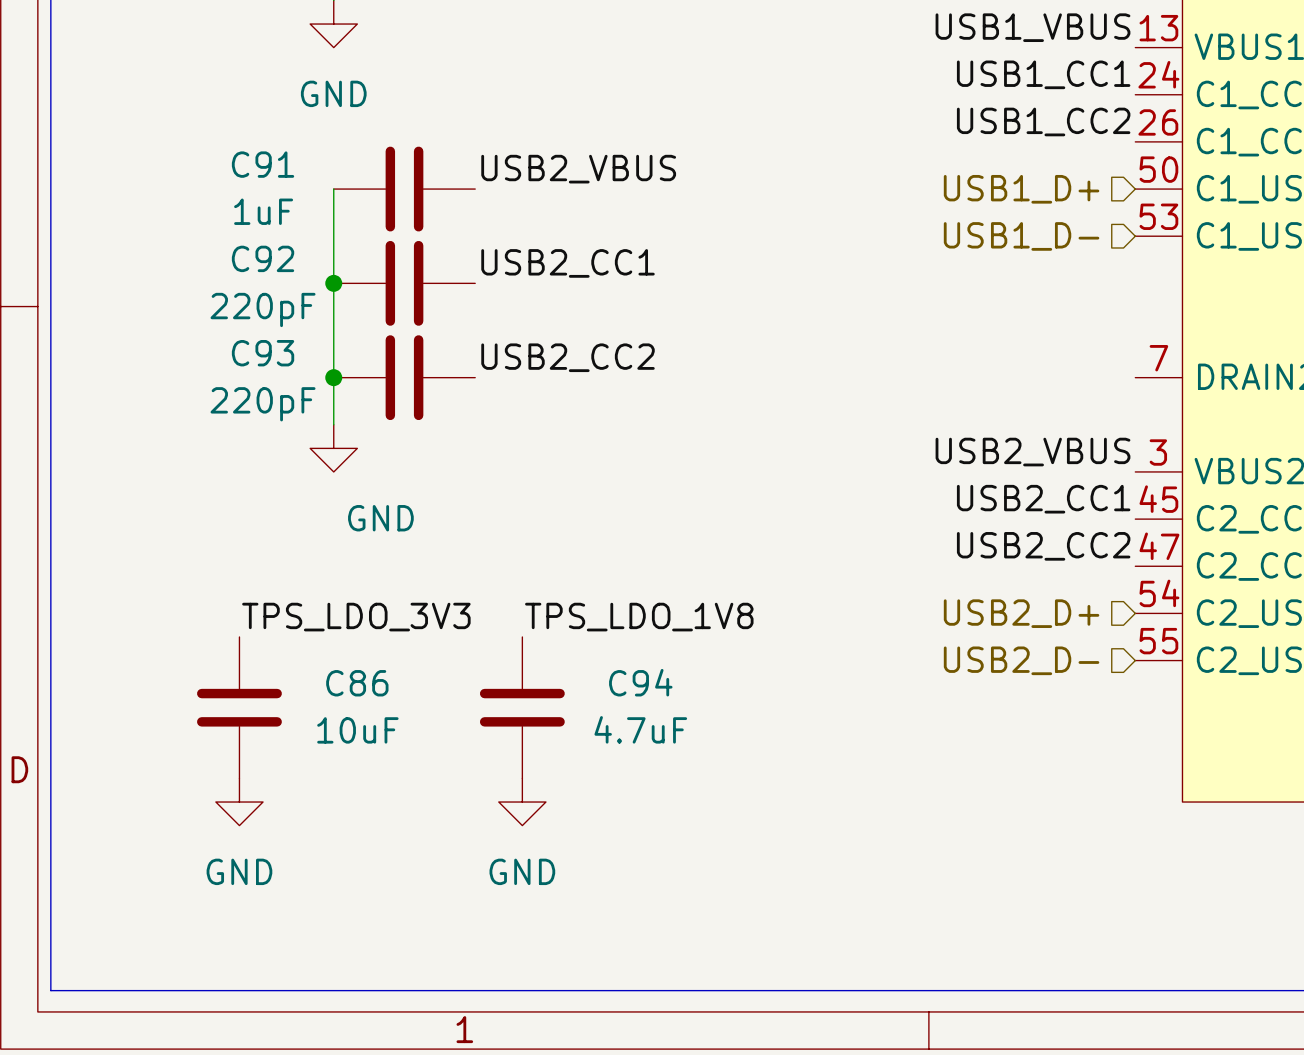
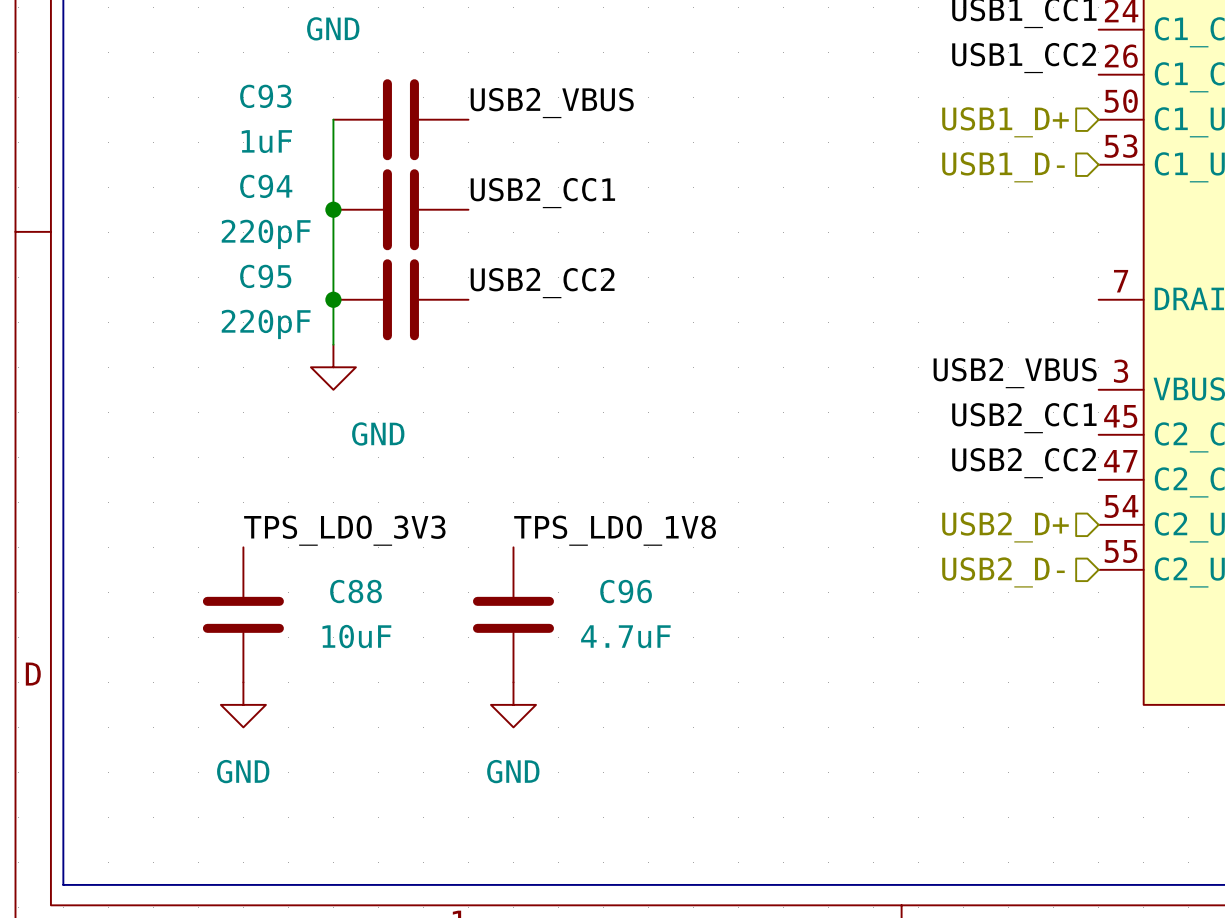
C91 name: C91 (263, 164) -> C93 (265, 96)
C92 name: C92 (263, 258) -> C94 (266, 186)
C93 name: C93 (263, 353) -> C95 (265, 276)
C94 name: C94 (640, 682) -> C96 (626, 591)
C86 name: C86 (357, 683) -> C88 (356, 591)

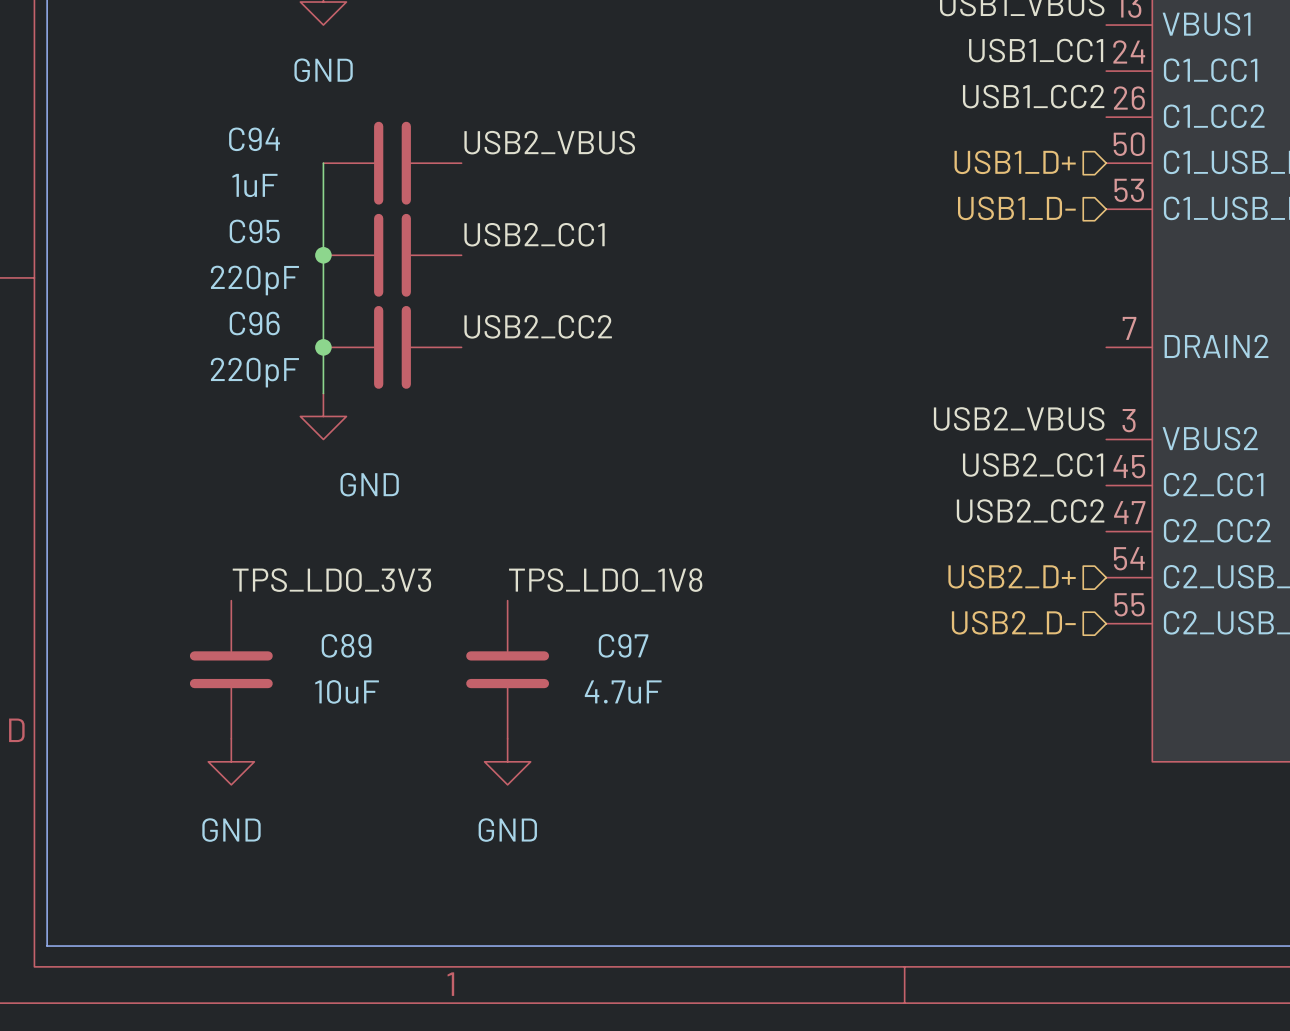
C93 name: C93 (265, 96) -> C94 (254, 139)
C94 name: C94 (266, 186) -> C95 (254, 231)
C95 name: C95 (265, 276) -> C96 (254, 323)
C88 name: C88 (356, 591) -> C89 (346, 645)
C96 name: C96 (626, 591) -> C97 (623, 645)

